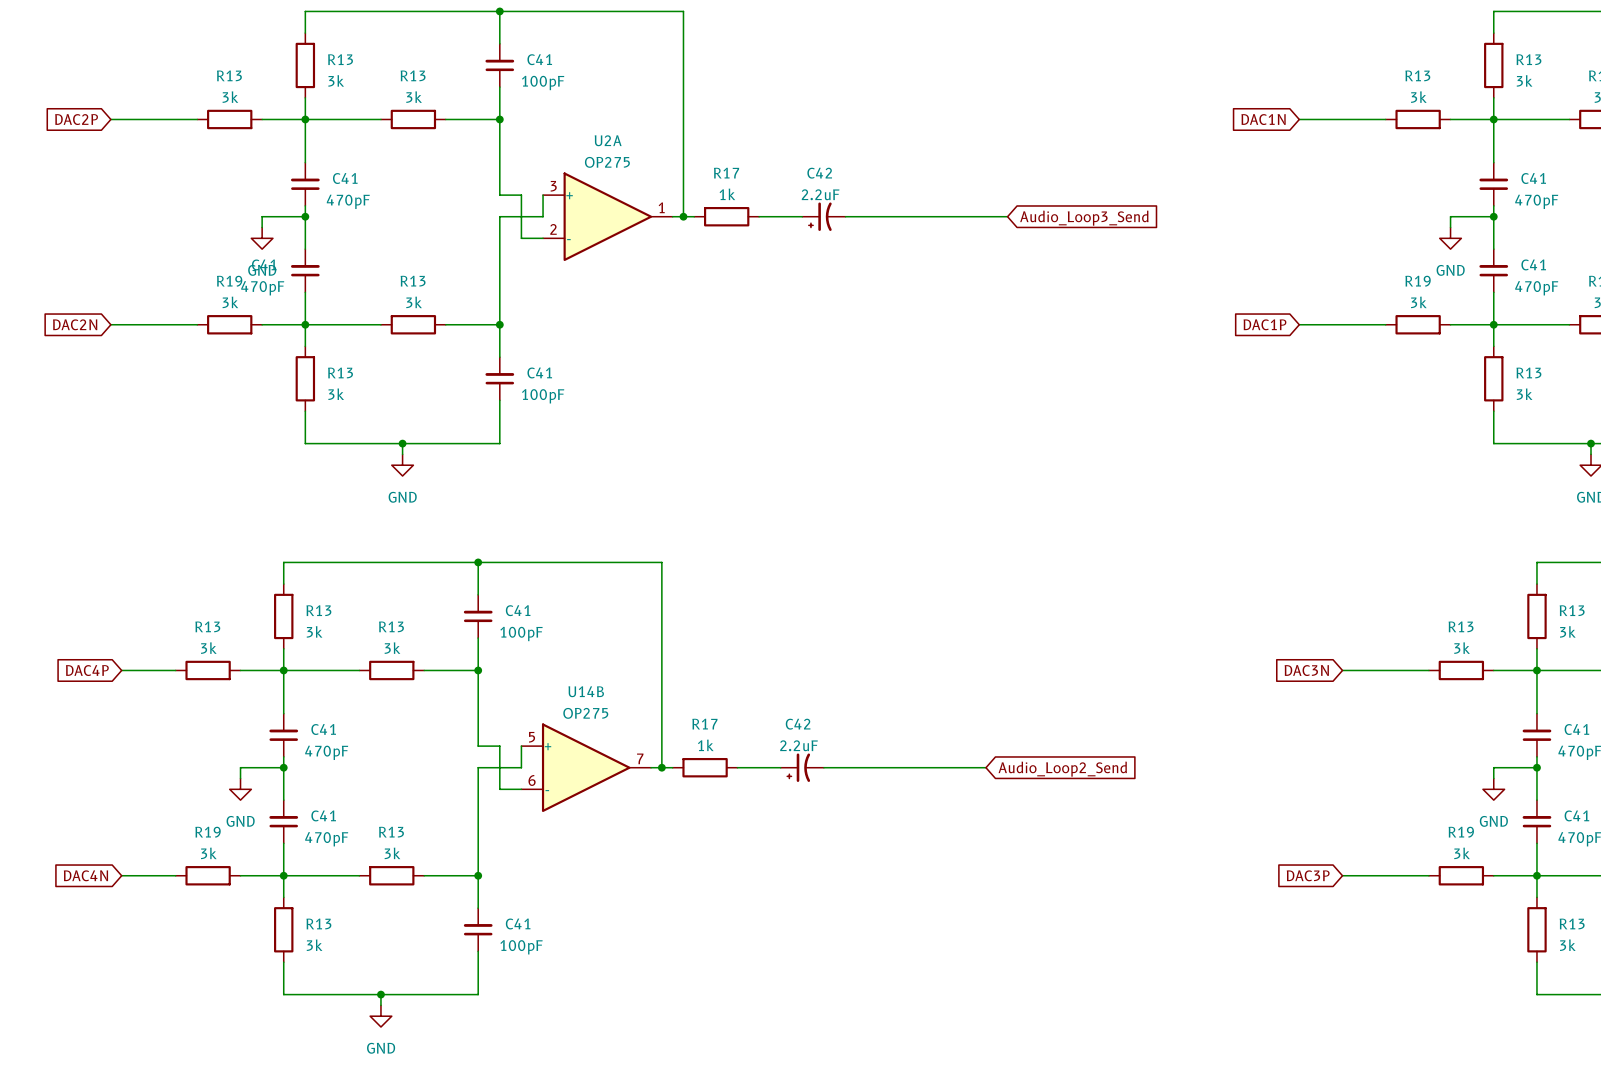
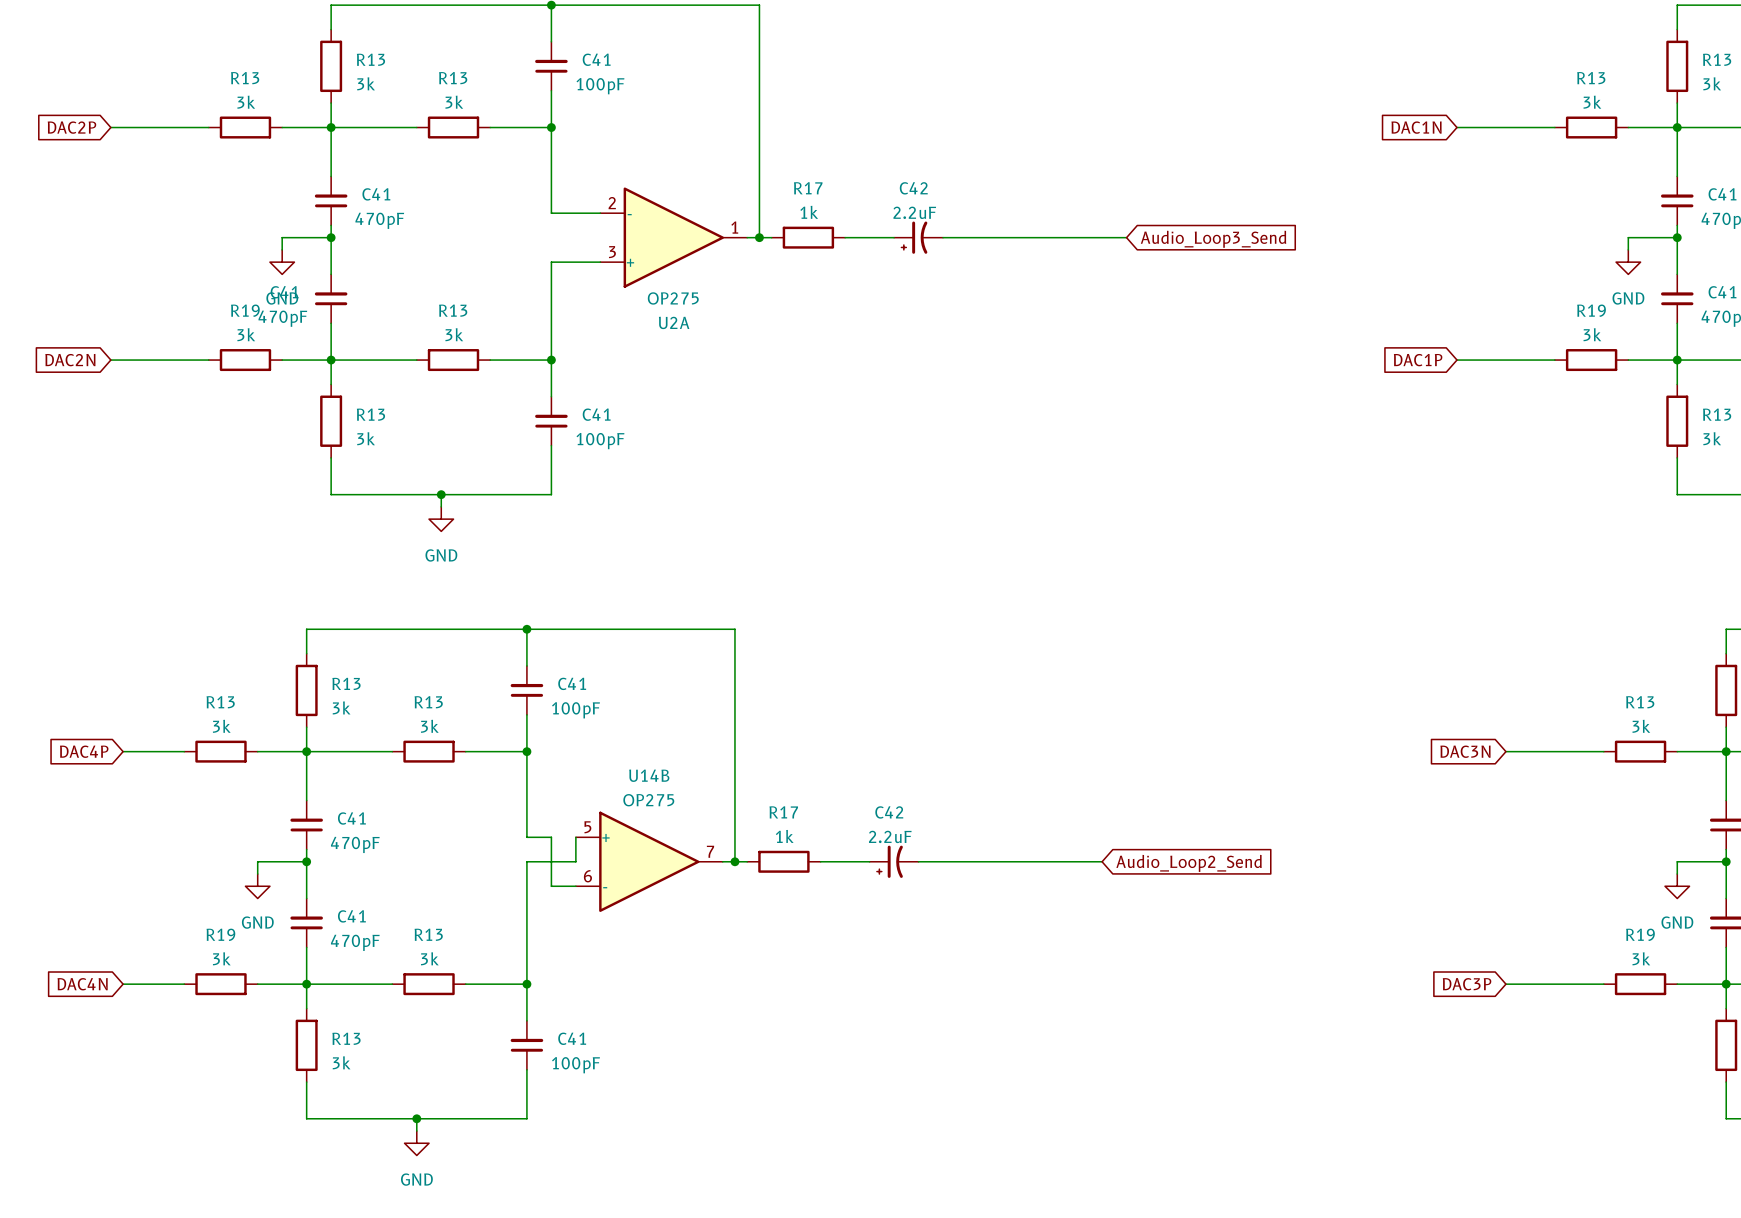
wire: (521, 195) (521, 238) -> (575, 213) (600, 213)
wire: (543, 195) (543, 216) (499, 216) (499, 238) -> (575, 262) (551, 262)
U2A flip: as is (607, 216) -> up-down (673, 237)

